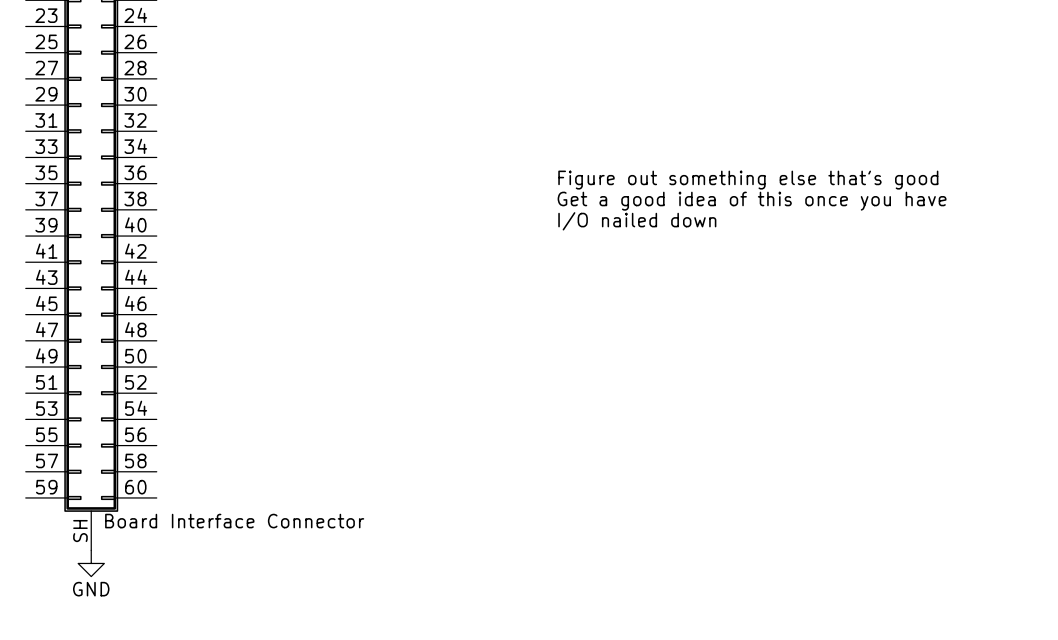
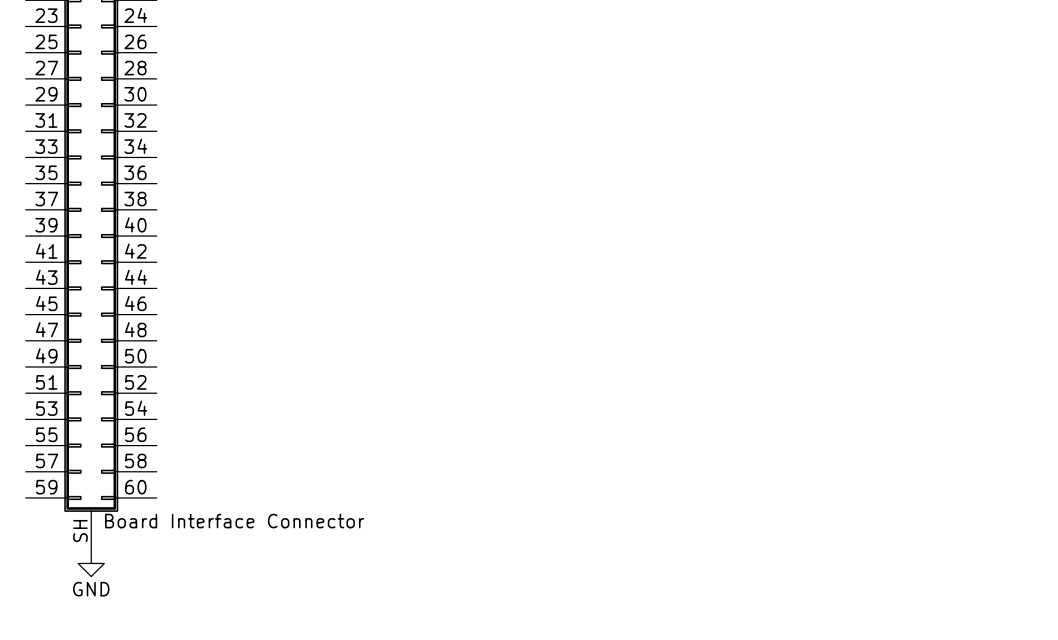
text: Figure out something else that's good (748, 180) -> none
text: Get a good idea of this once you have (752, 201) -> none
text: I/O nailed down (637, 221) -> none

